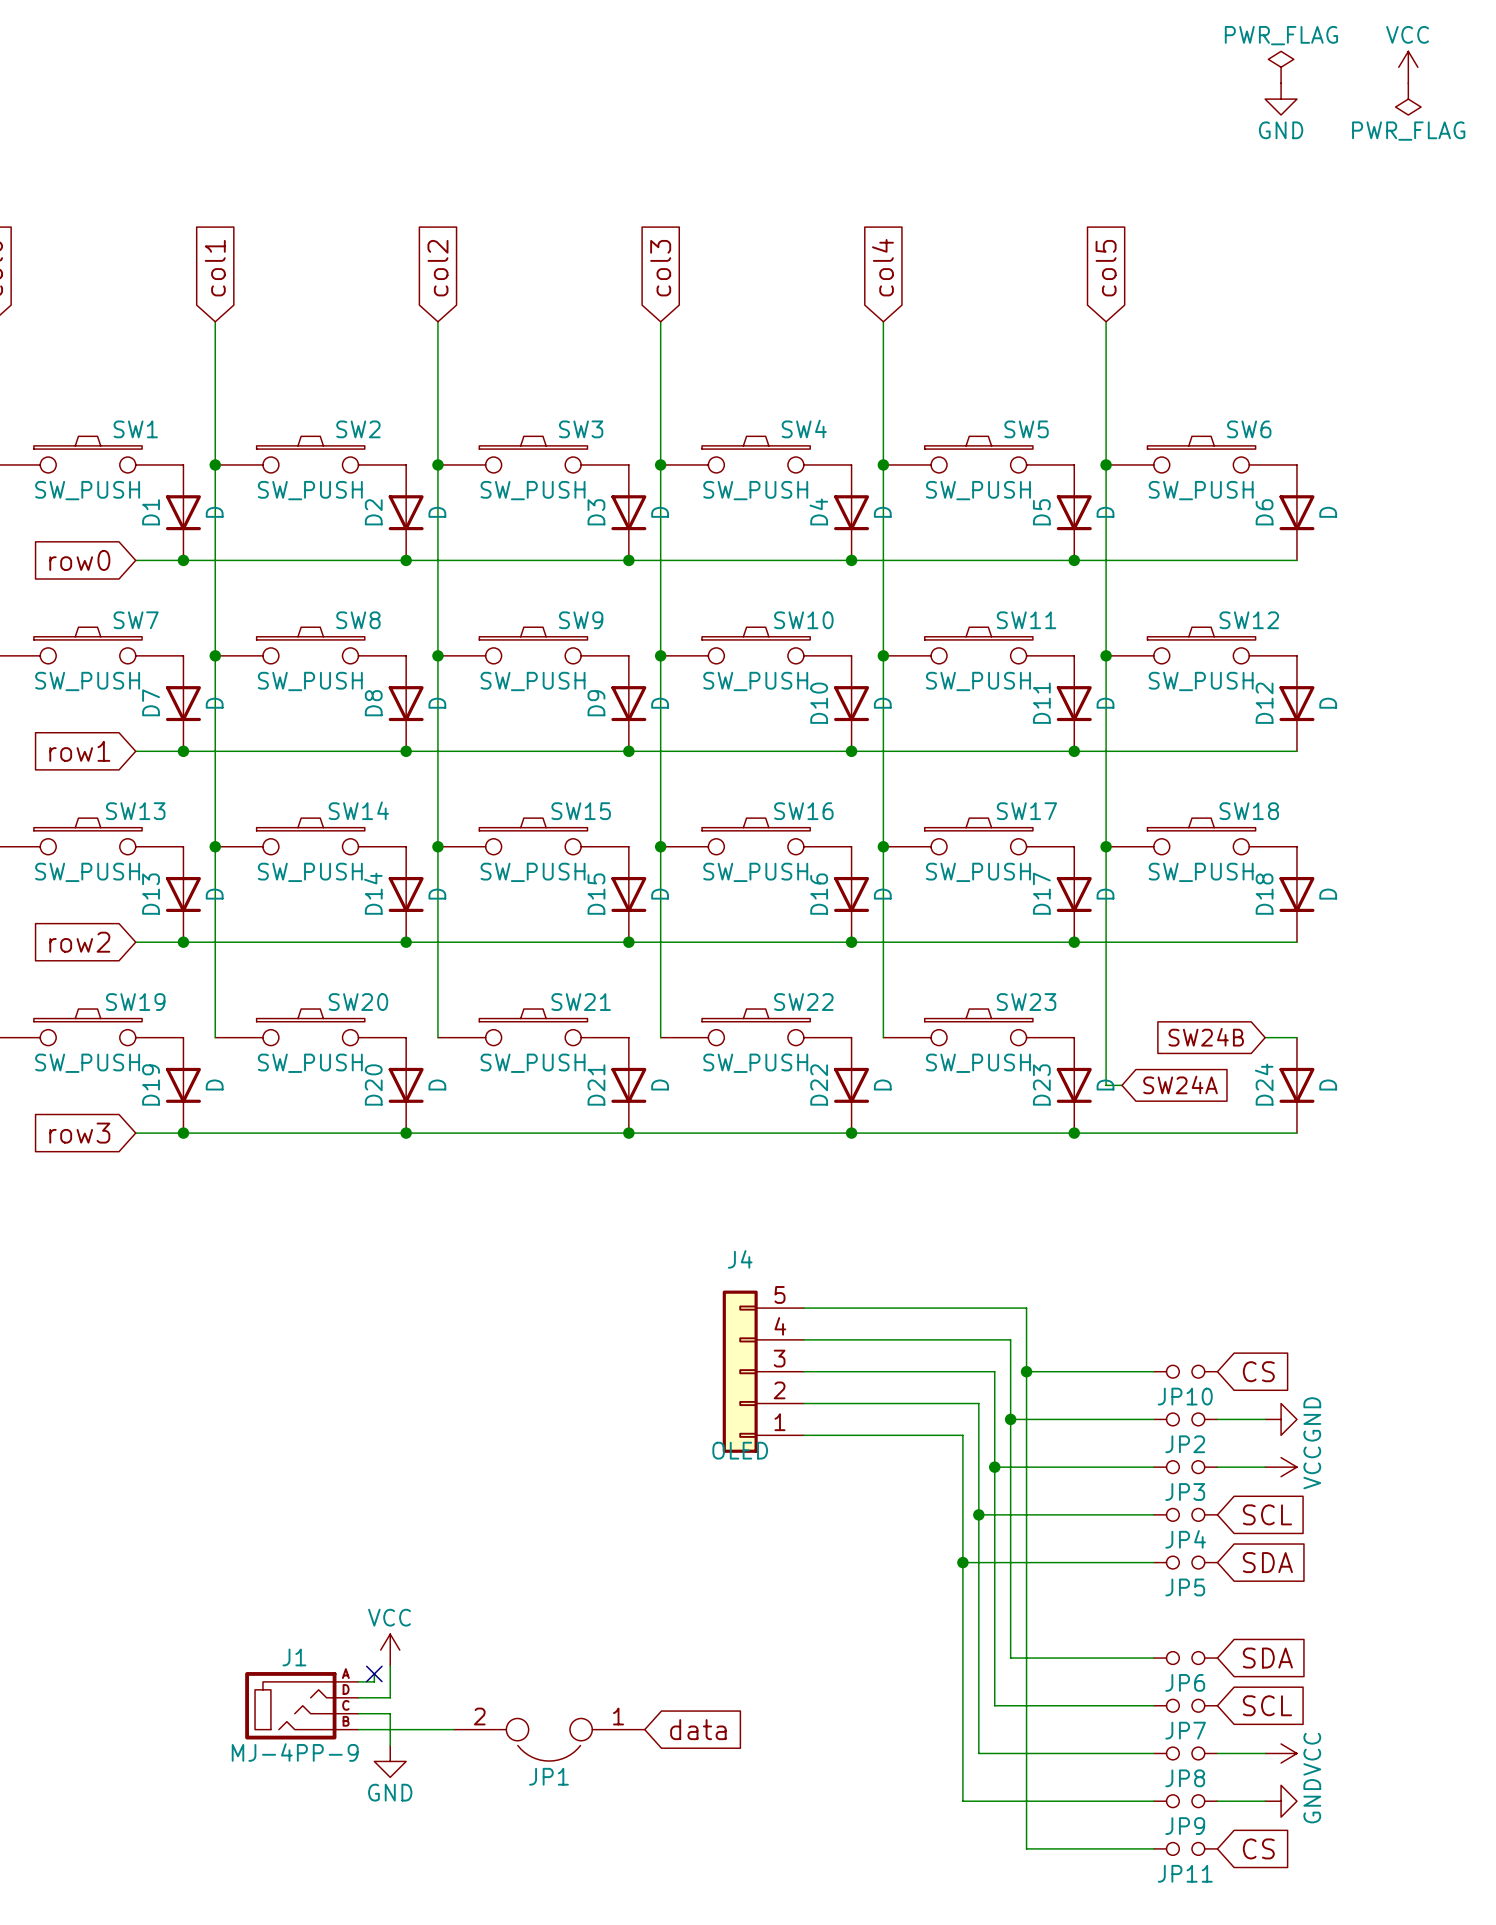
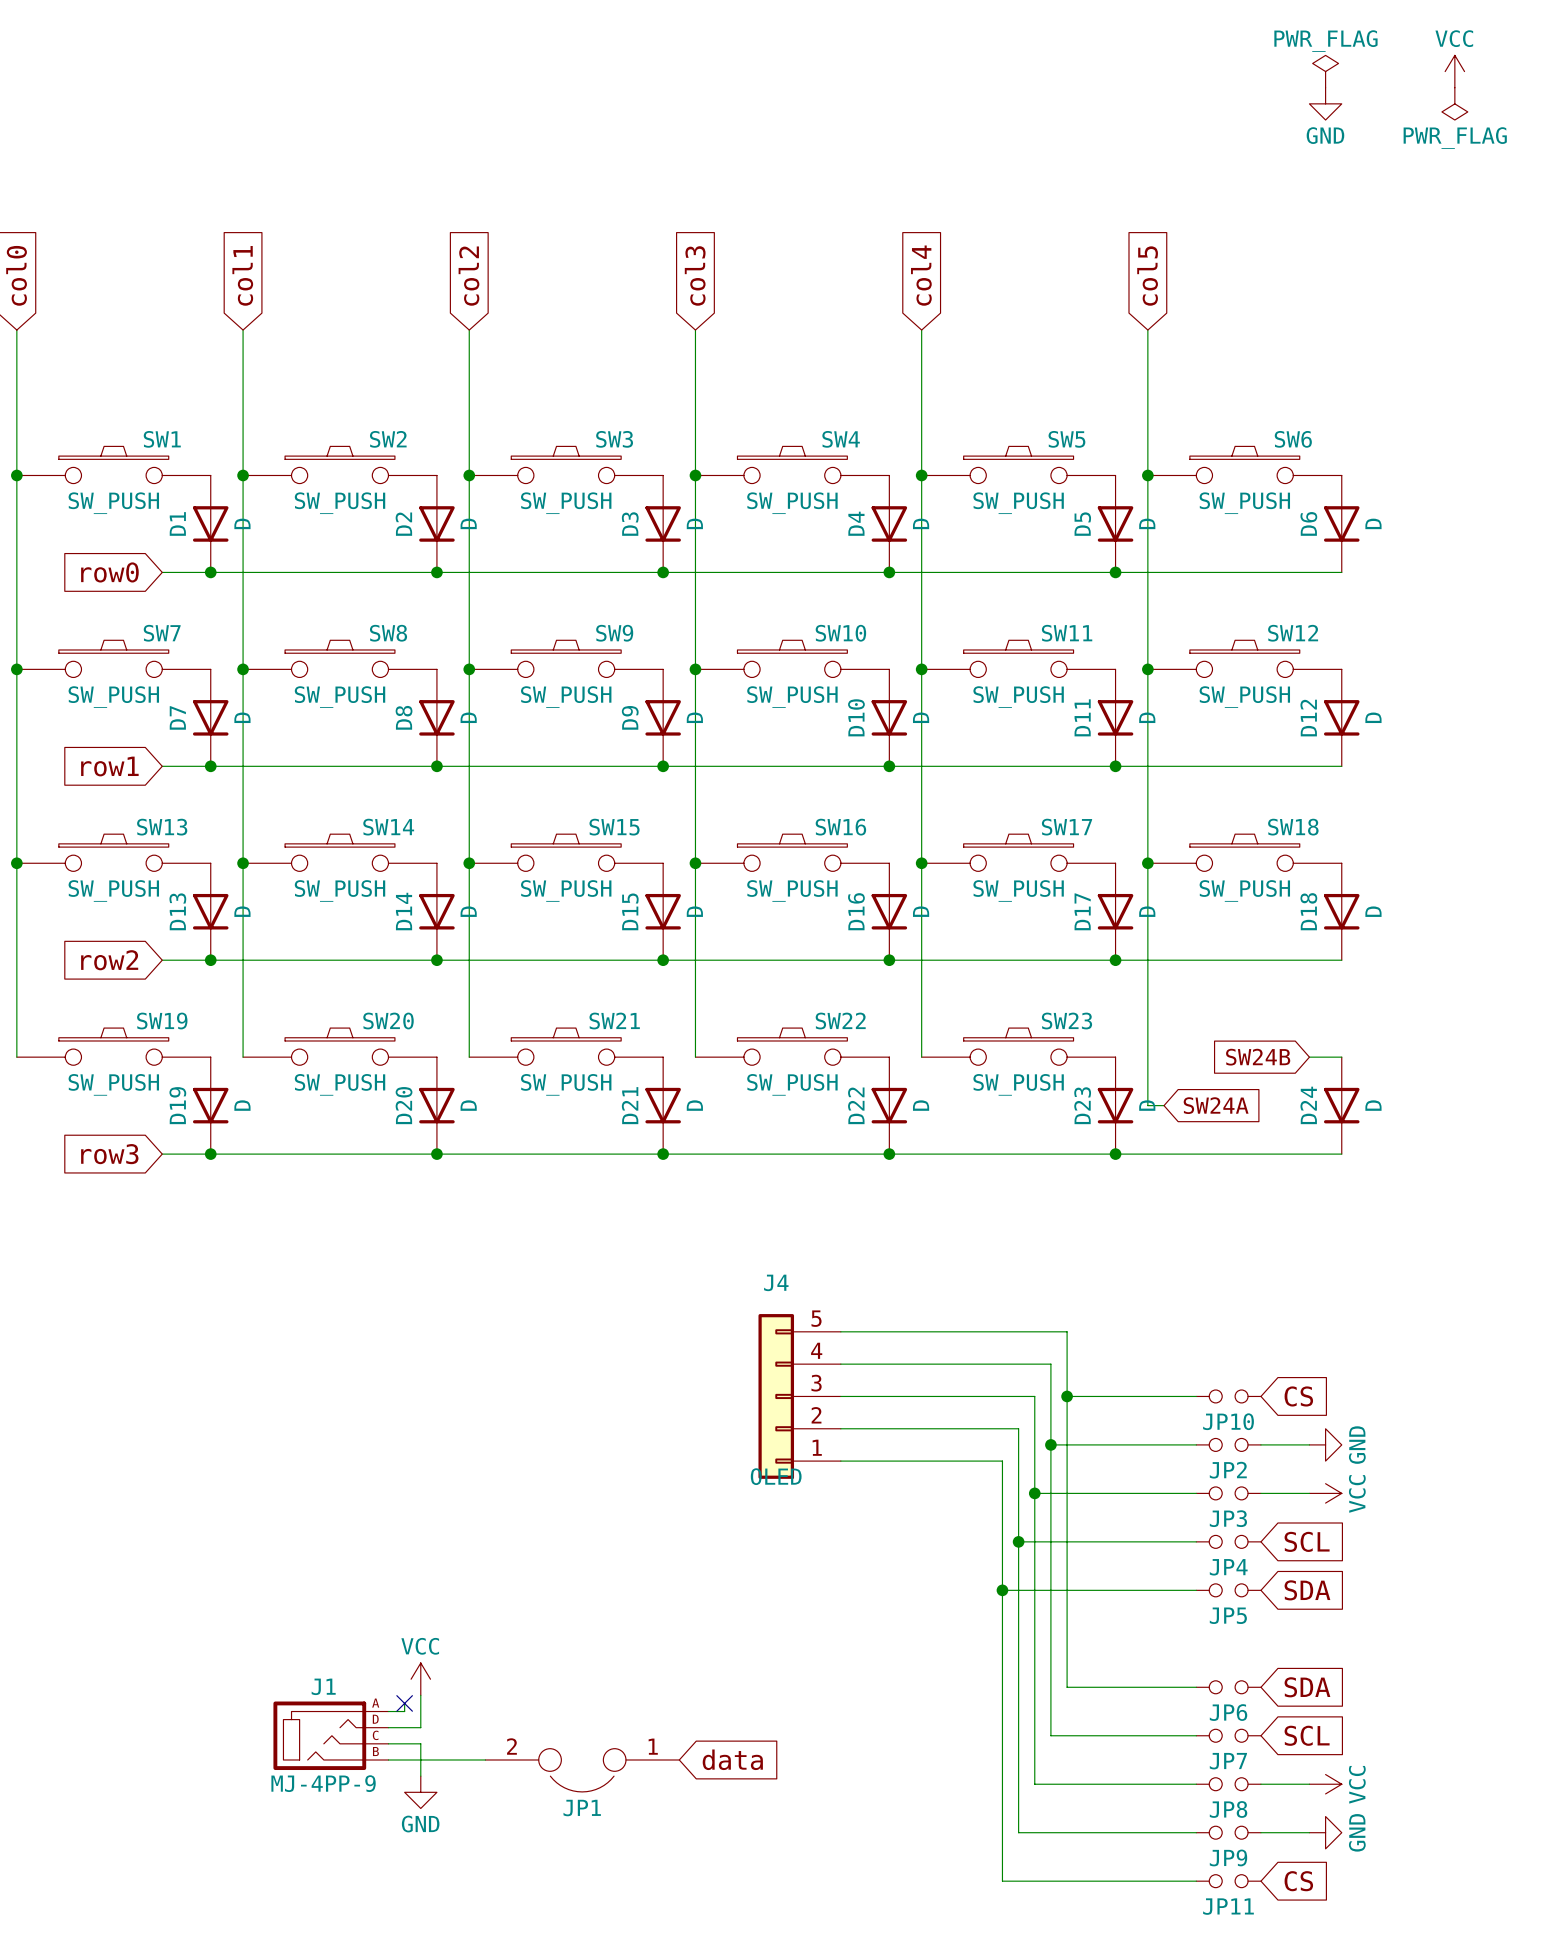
wire: (1010, 1658) (1026, 1658) (1026, 1848) -> (1050, 1687) (1050, 1735)
wire: (994, 1705) (1010, 1705) -> (1034, 1735) (1034, 1784)
wire: (978, 1753) (994, 1753) -> none
wire: (962, 1801) (978, 1801) -> (1018, 1784) (1018, 1832)
wire: none -> (1002, 1832) (1002, 1881) (1067, 1881)

